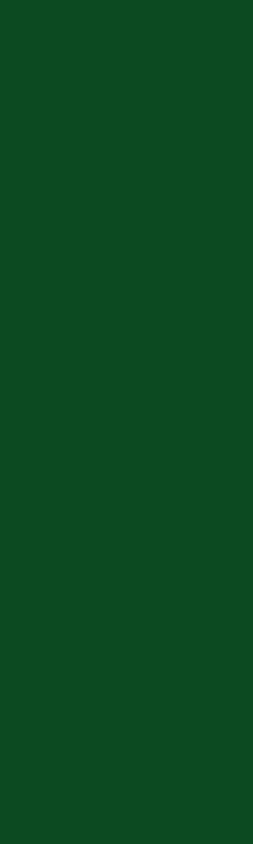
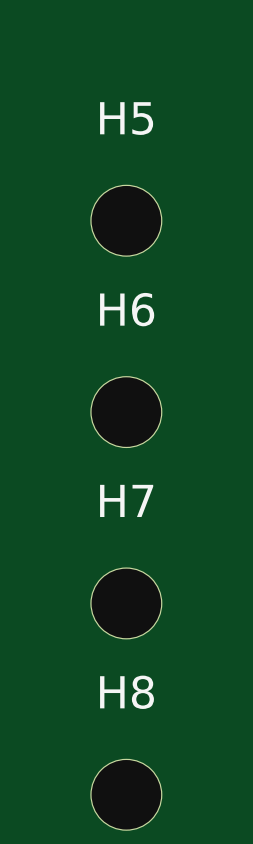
H5: none -> (126, 220)
H6: none -> (126, 412)
H7: none -> (126, 603)
H8: none -> (126, 794)

